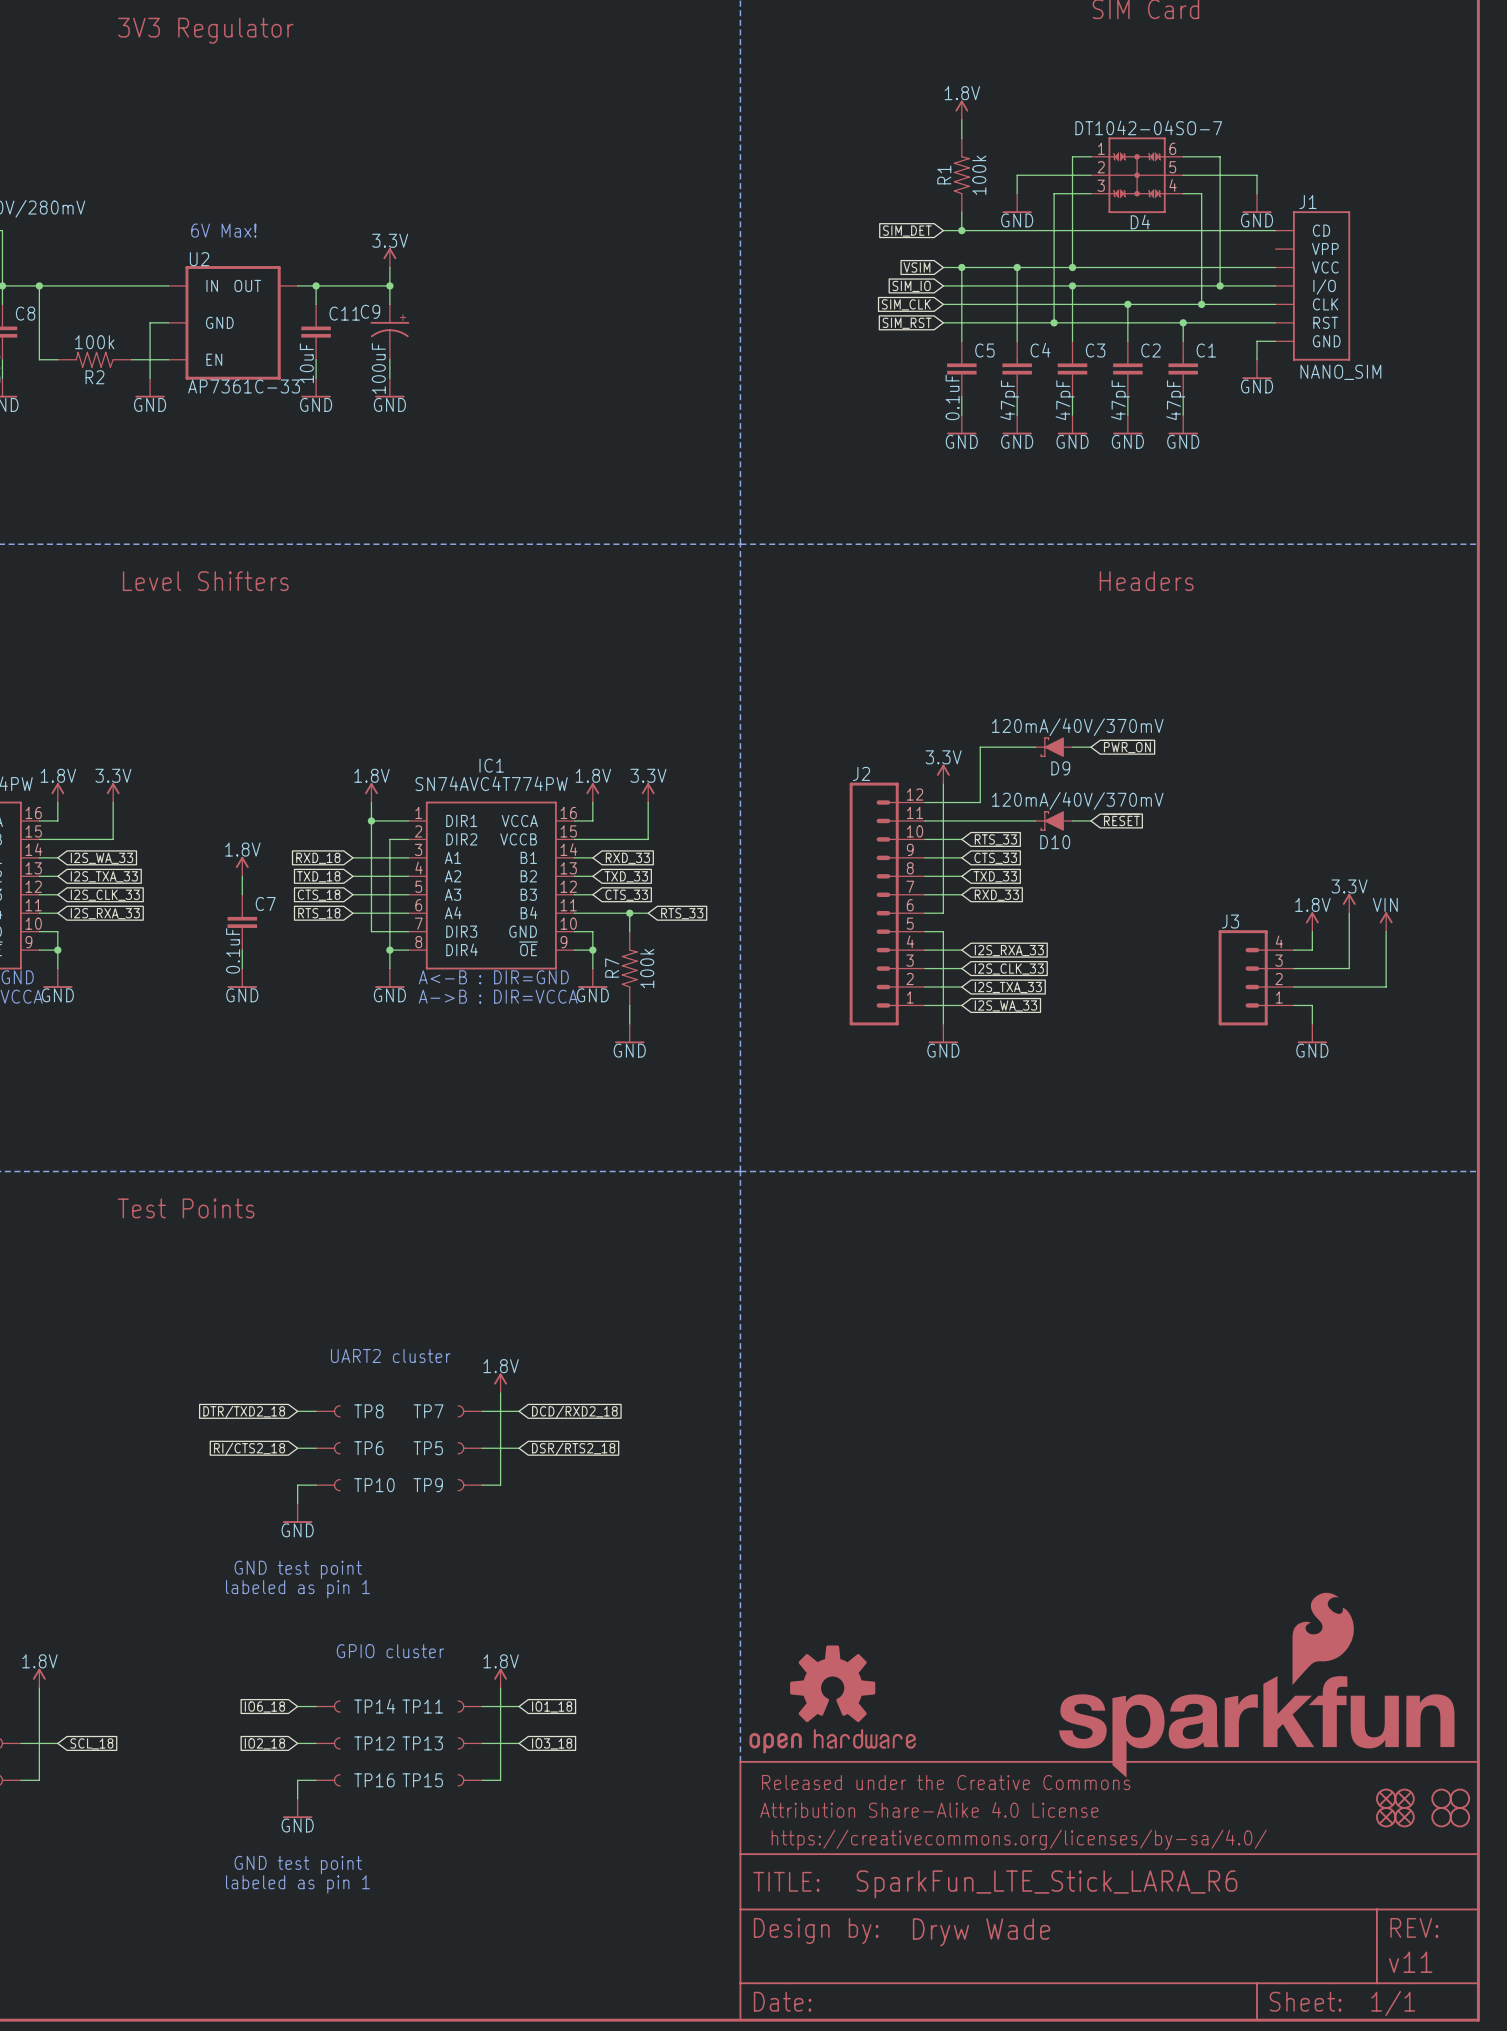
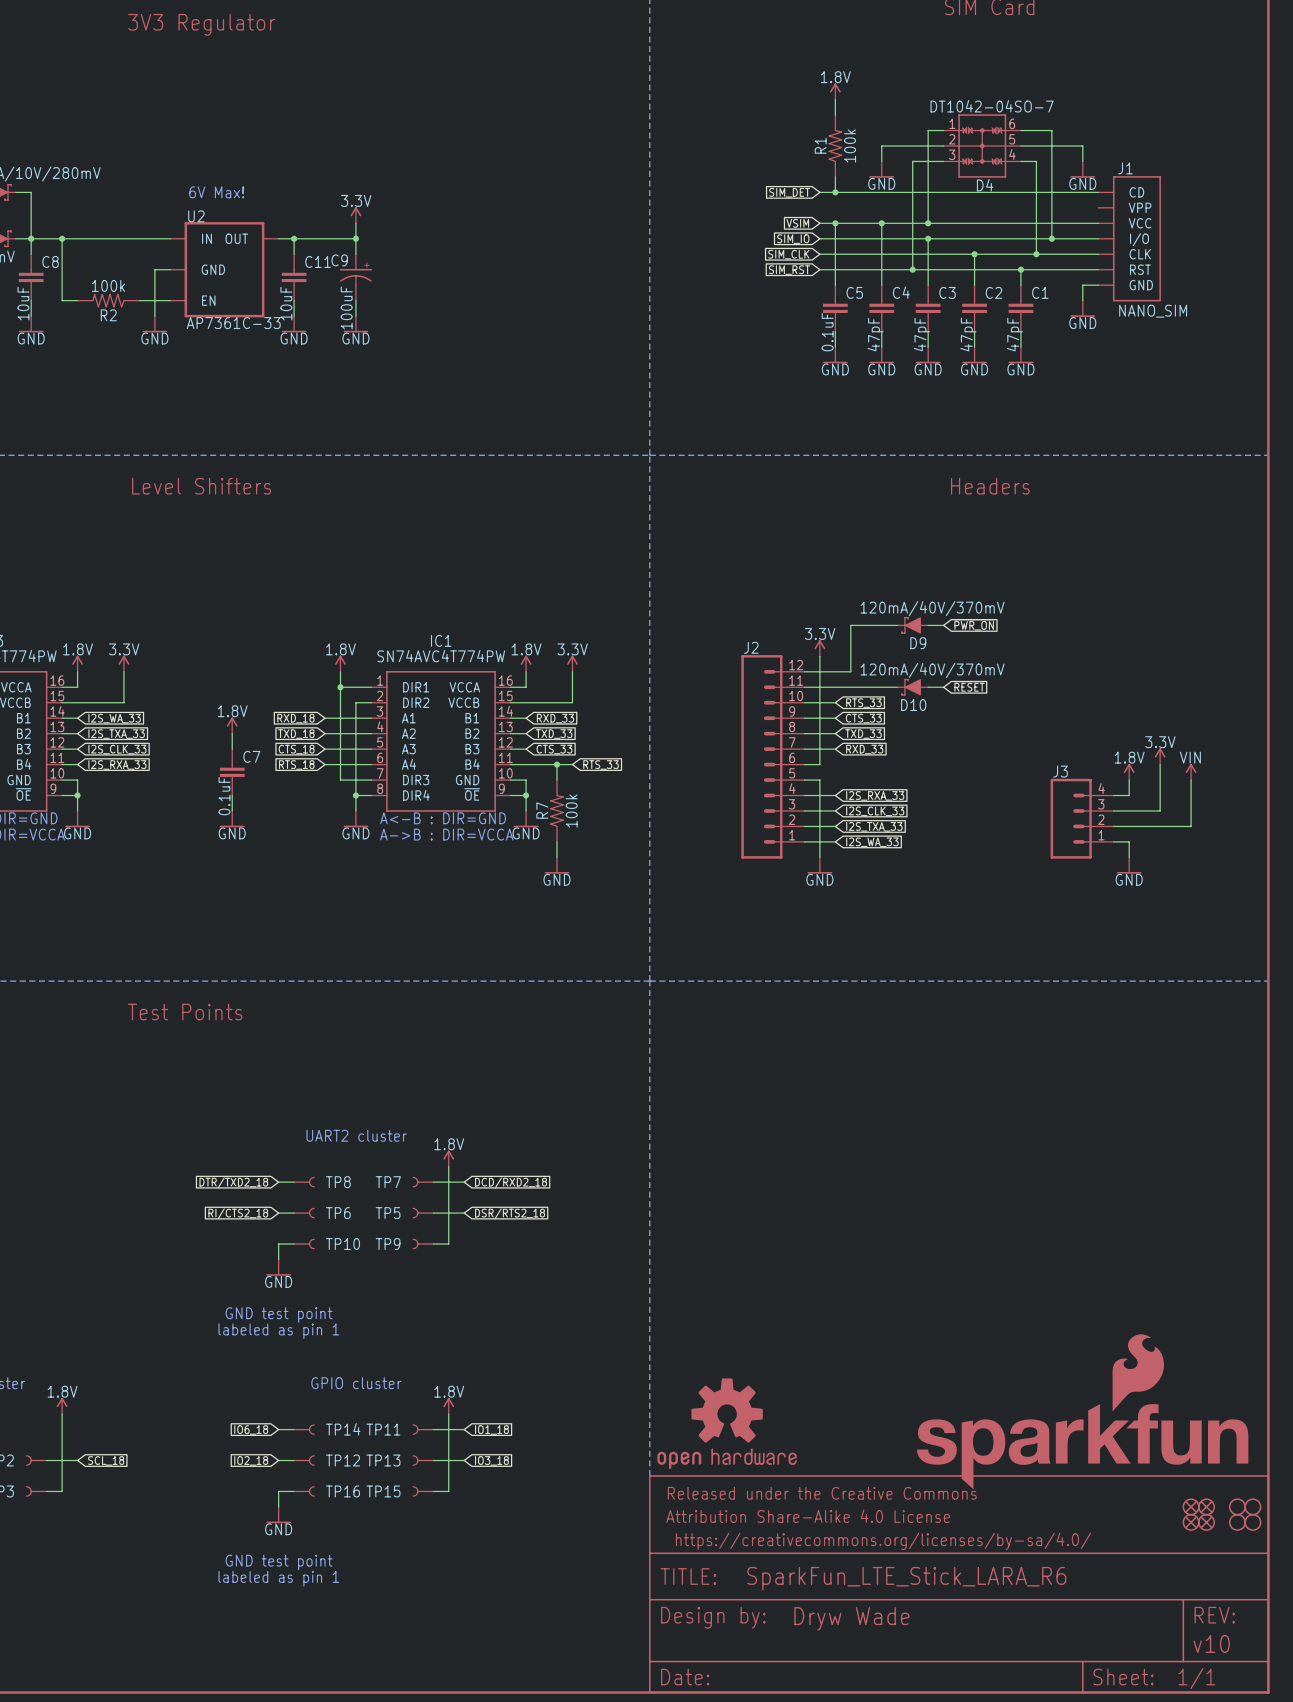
part text: v11 (1410, 1962) -> v10 (1211, 1643)

